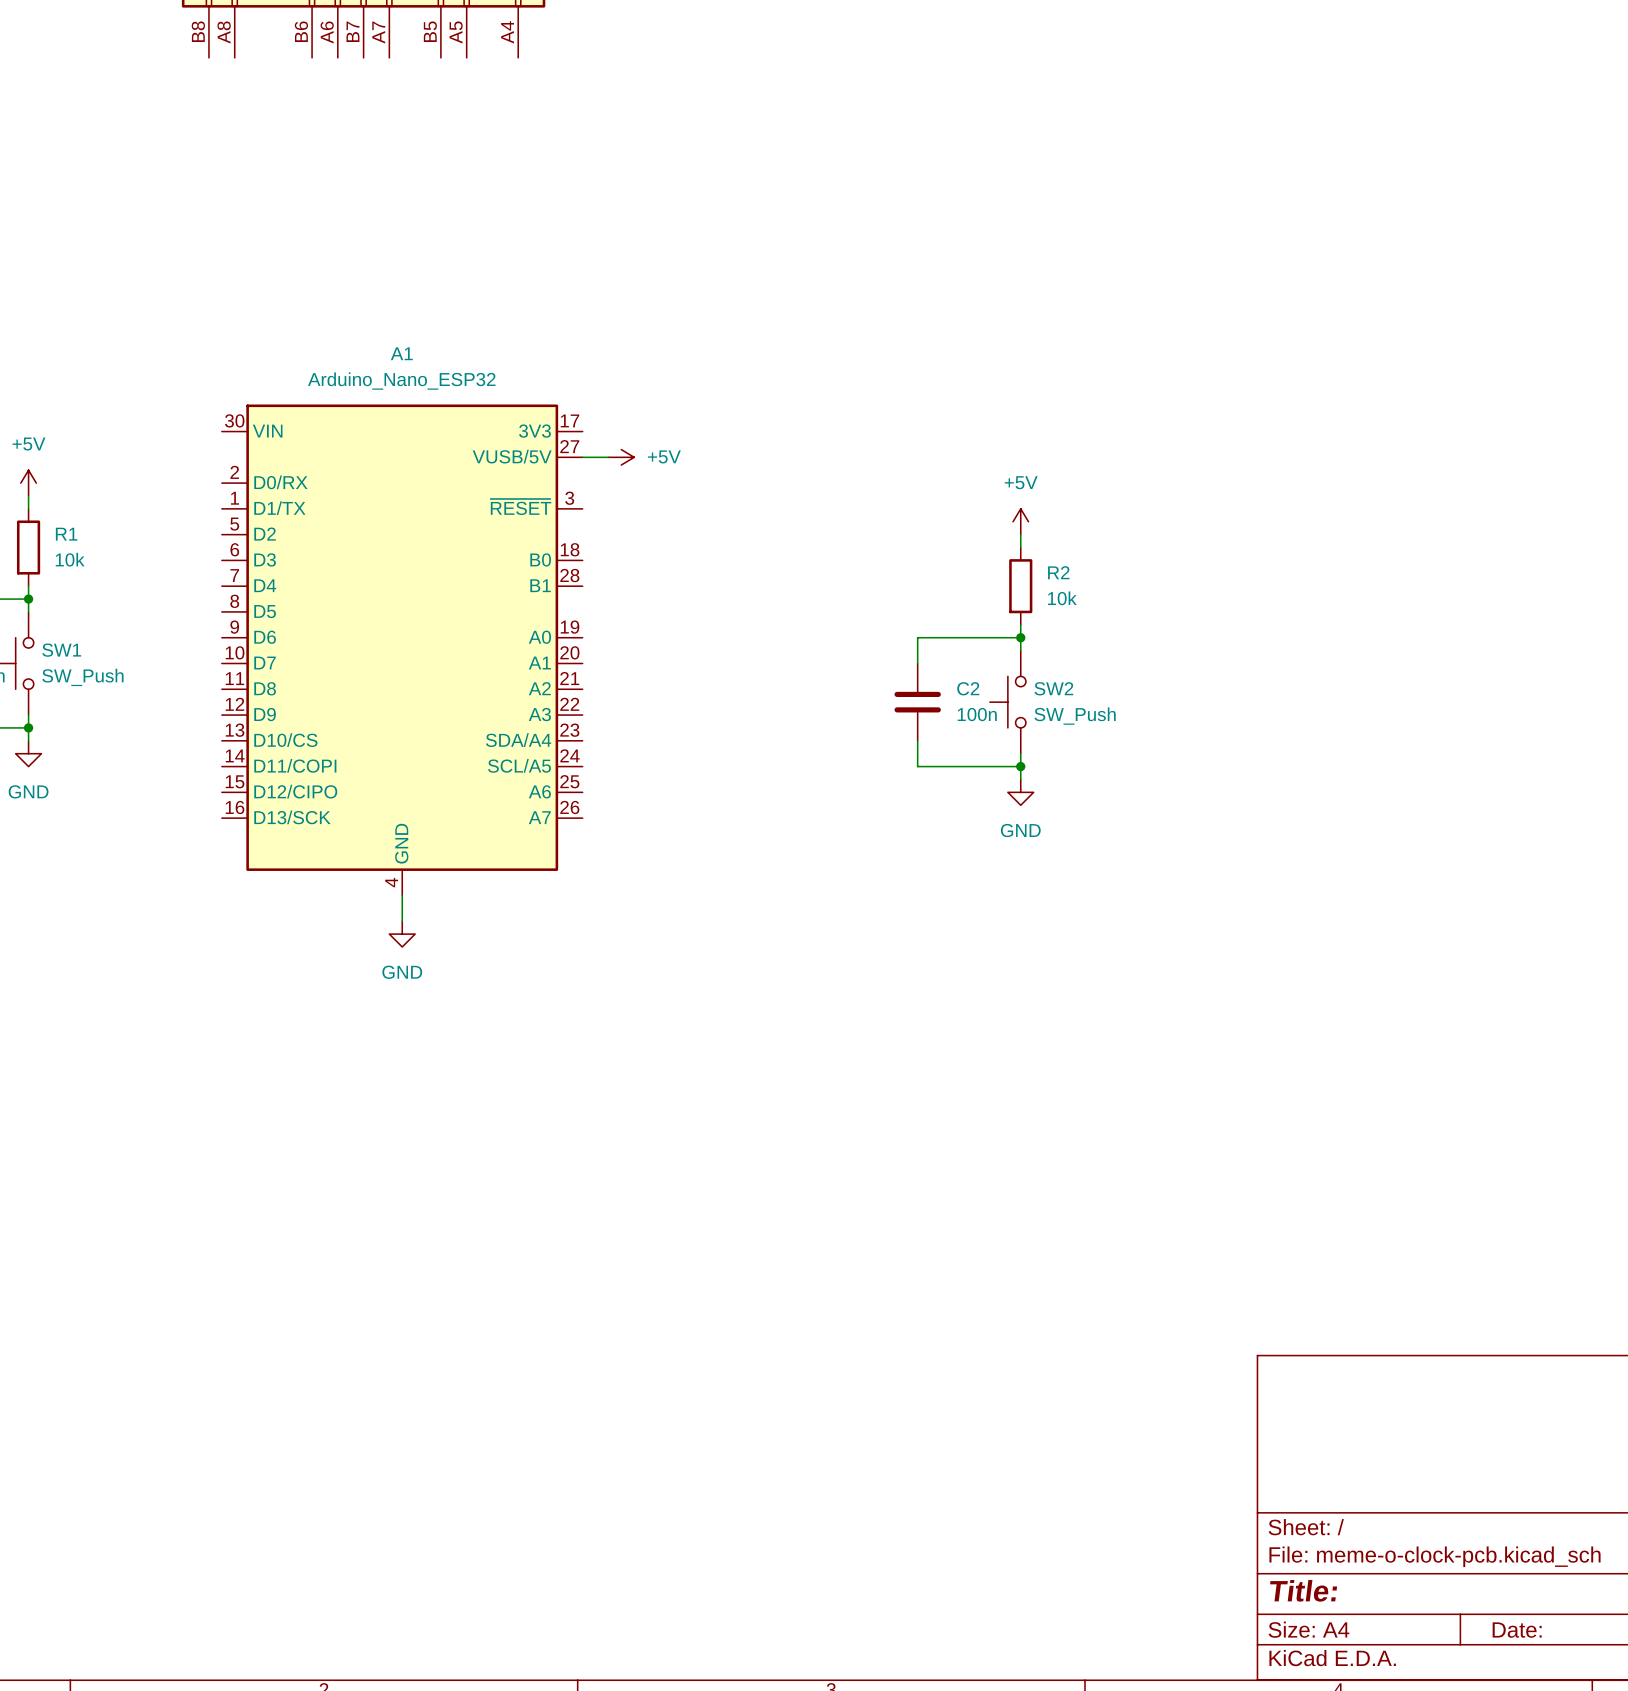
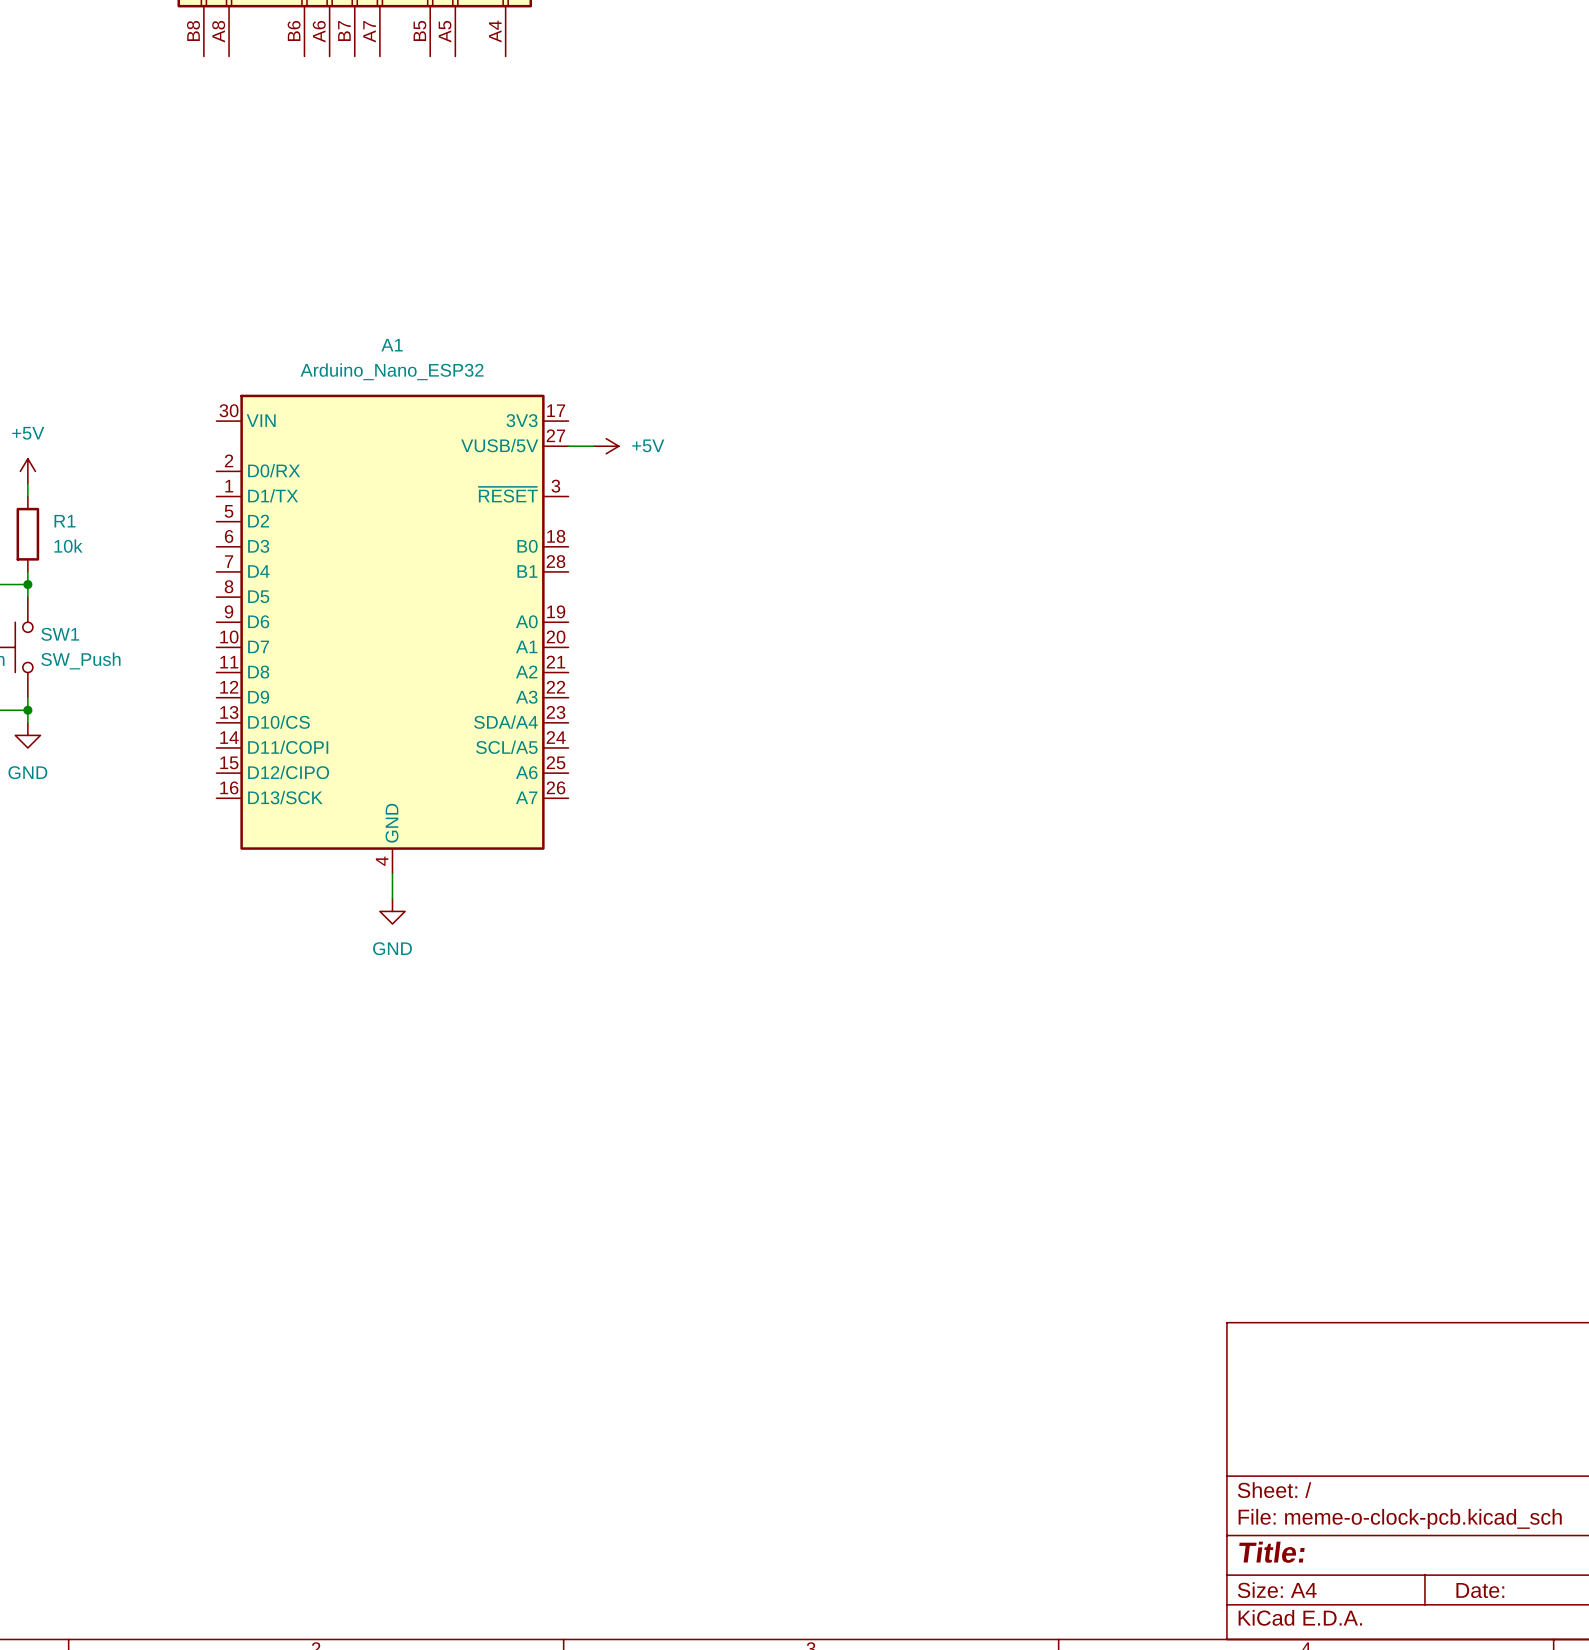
power symbol: +5V (1020, 521) -> none
wire: (1020, 534) (1020, 547) -> none
R2: 10k (1020, 586) -> none
wire: (1020, 624) (1020, 650) -> none
wire: (1020, 637) (917, 637) (917, 663) -> none
junction: (1020, 637) -> none
C2: 100n (917, 702) -> none
SW2: SW_Push (1007, 702) -> none
wire: (917, 740) (917, 766) (1020, 766) -> none
wire: (1020, 753) (1020, 779) -> none
junction: (1020, 766) -> none
power symbol: GND (1020, 792) -> none

